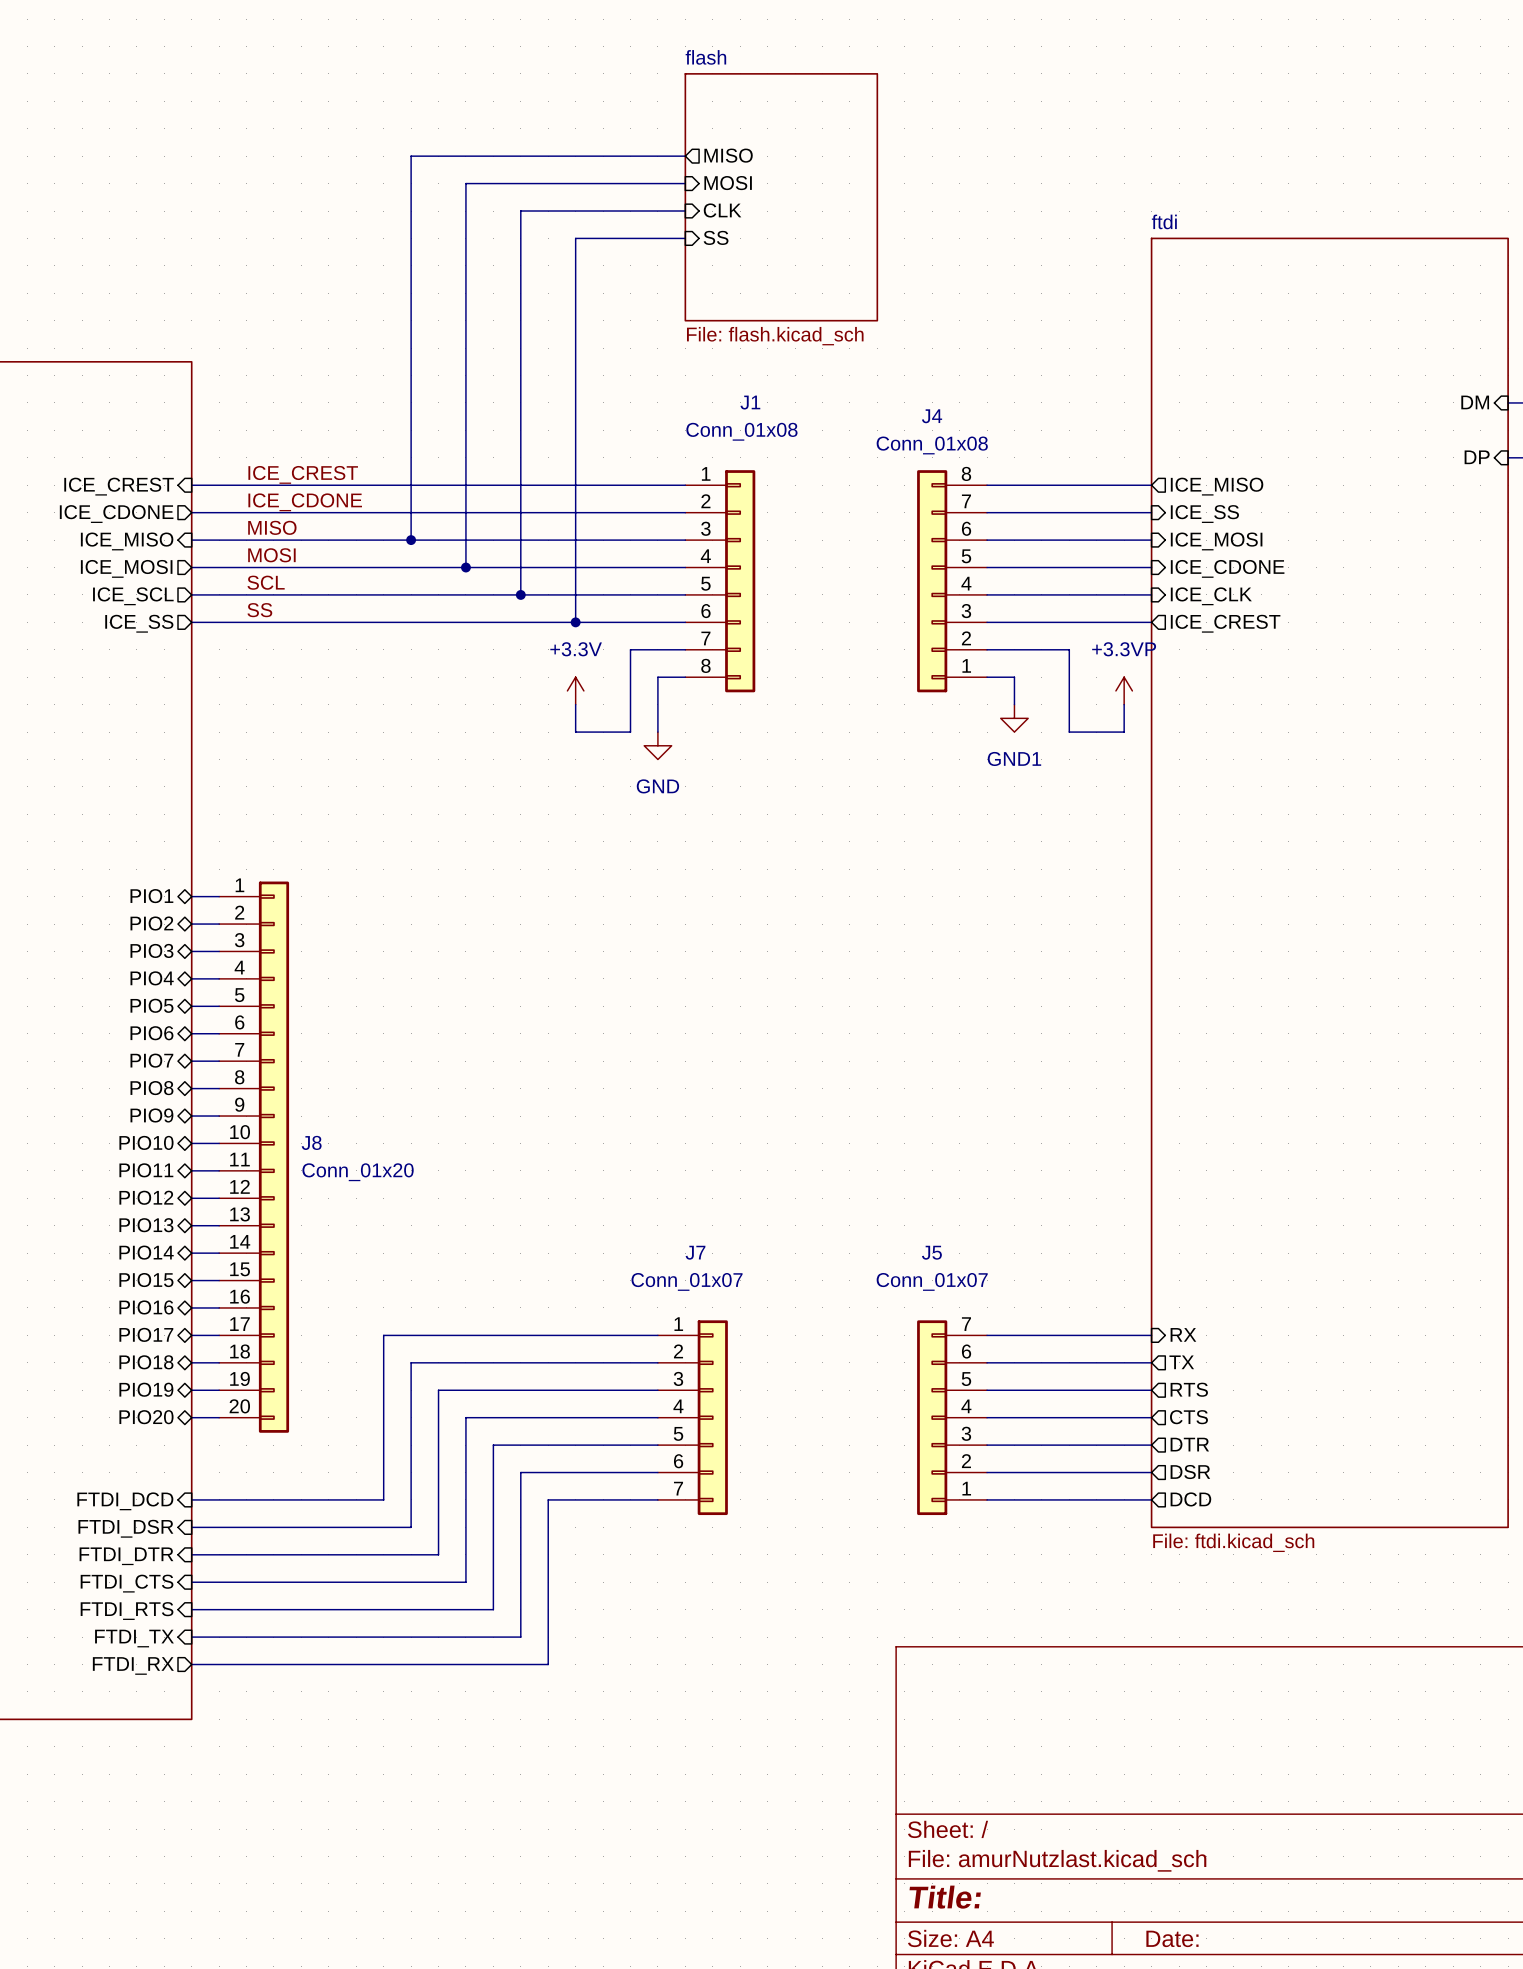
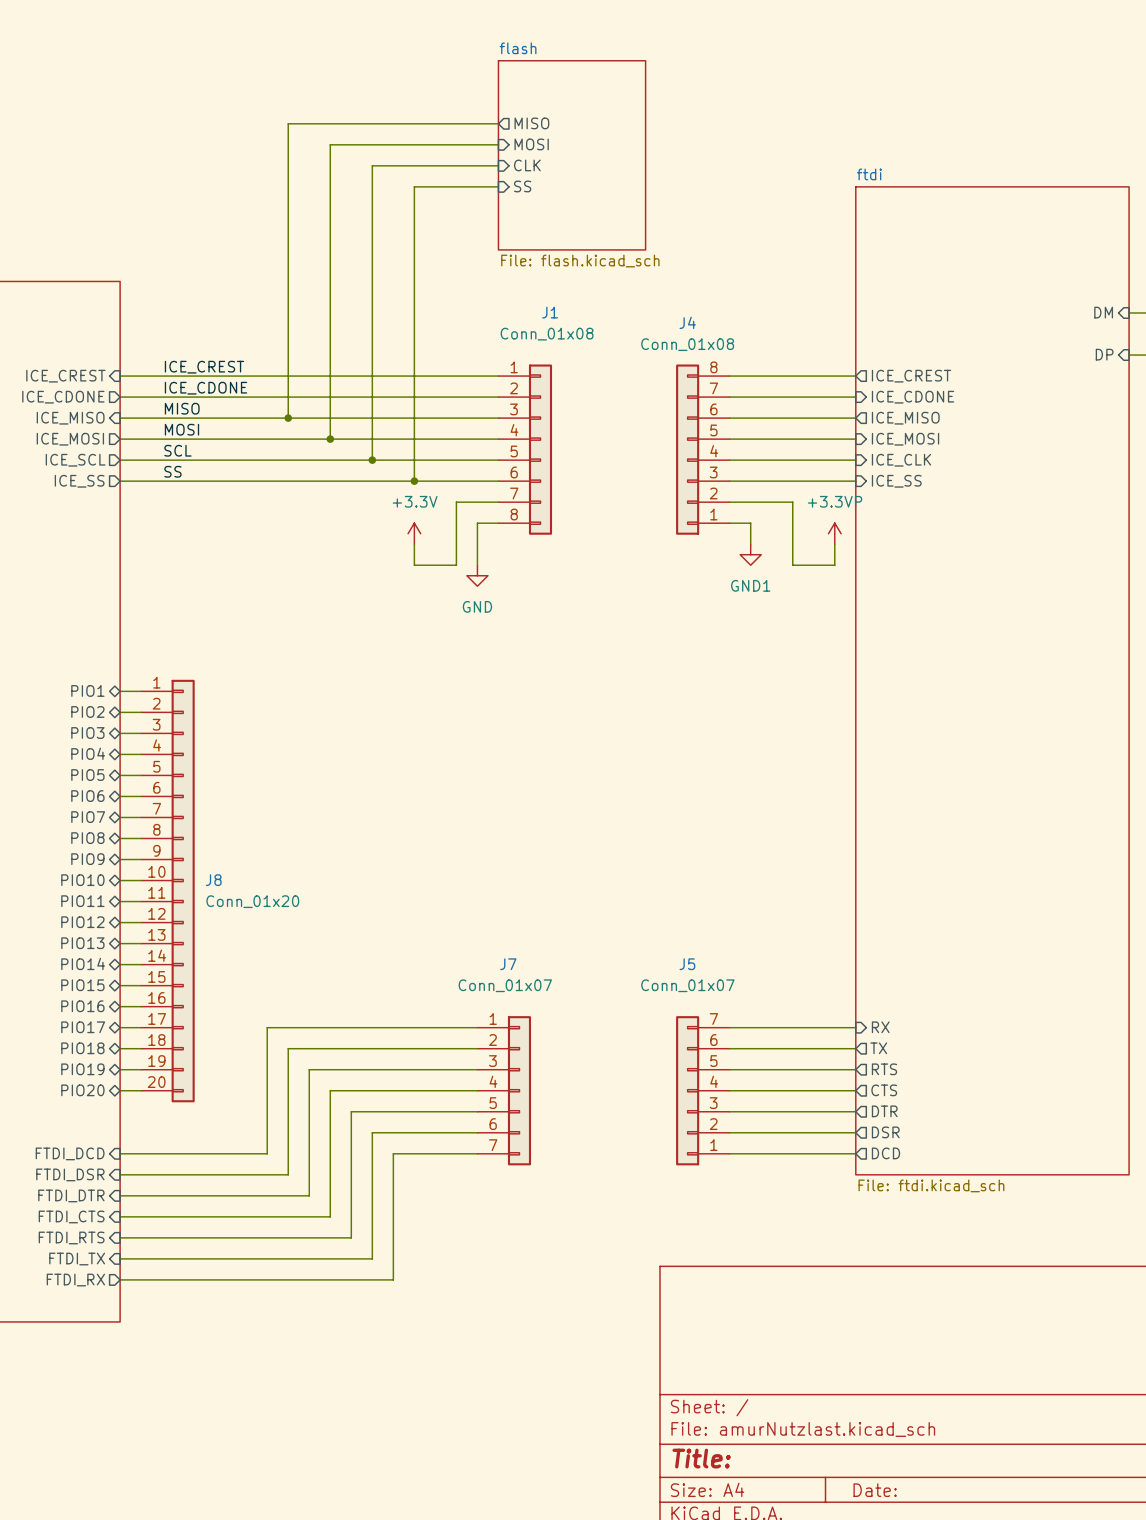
sheet pin: ICE_MISO (1217, 486) -> ICE_CREST (911, 376)
sheet pin: ICE_SS (1204, 514) -> ICE_CDONE (913, 397)
sheet pin shape: input (1216, 541) -> output (905, 418)
sheet pin: ICE_MOSI (1216, 541) -> ICE_MISO (905, 418)
sheet pin: ICE_CDONE (1227, 568) -> ICE_MOSI (905, 439)
sheet pin shape: output (1225, 623) -> input (896, 481)
sheet pin: ICE_CREST (1225, 623) -> ICE_SS (896, 481)

